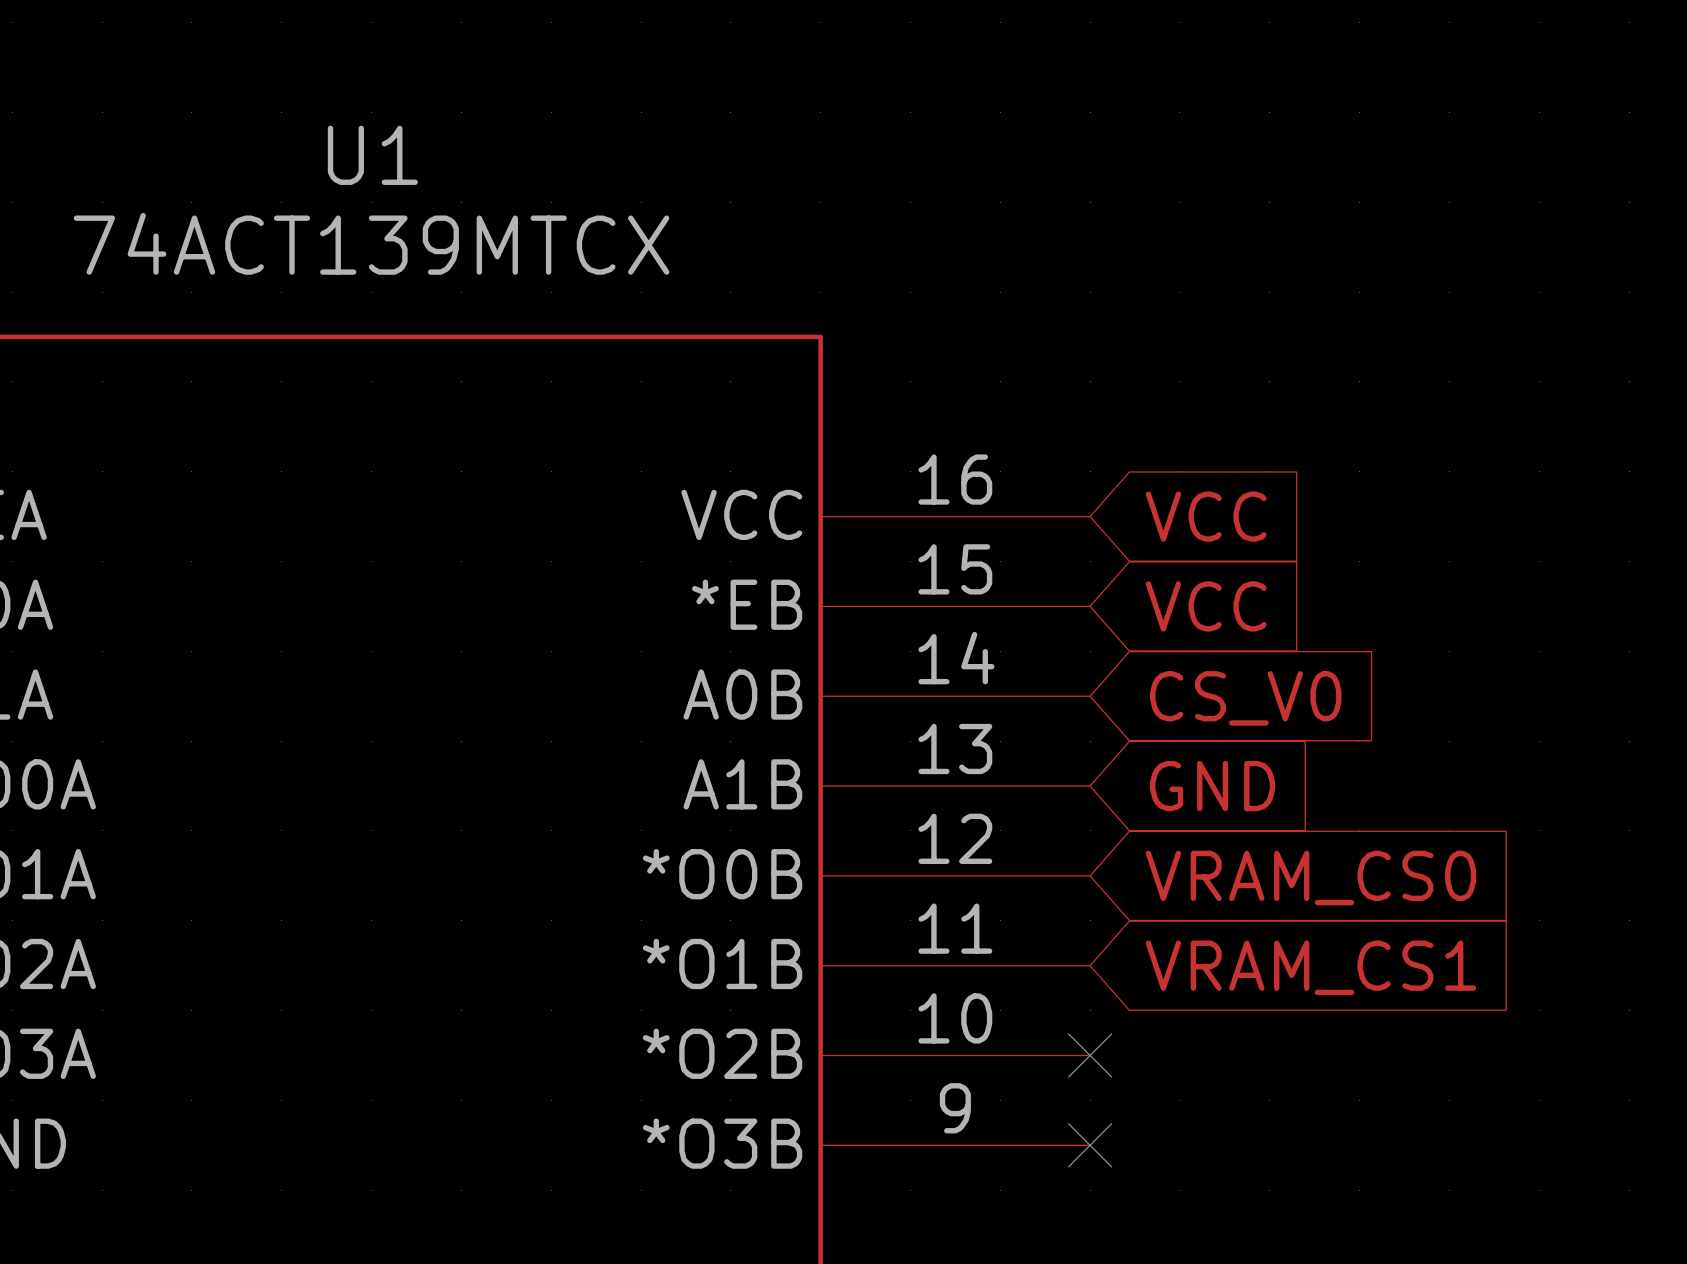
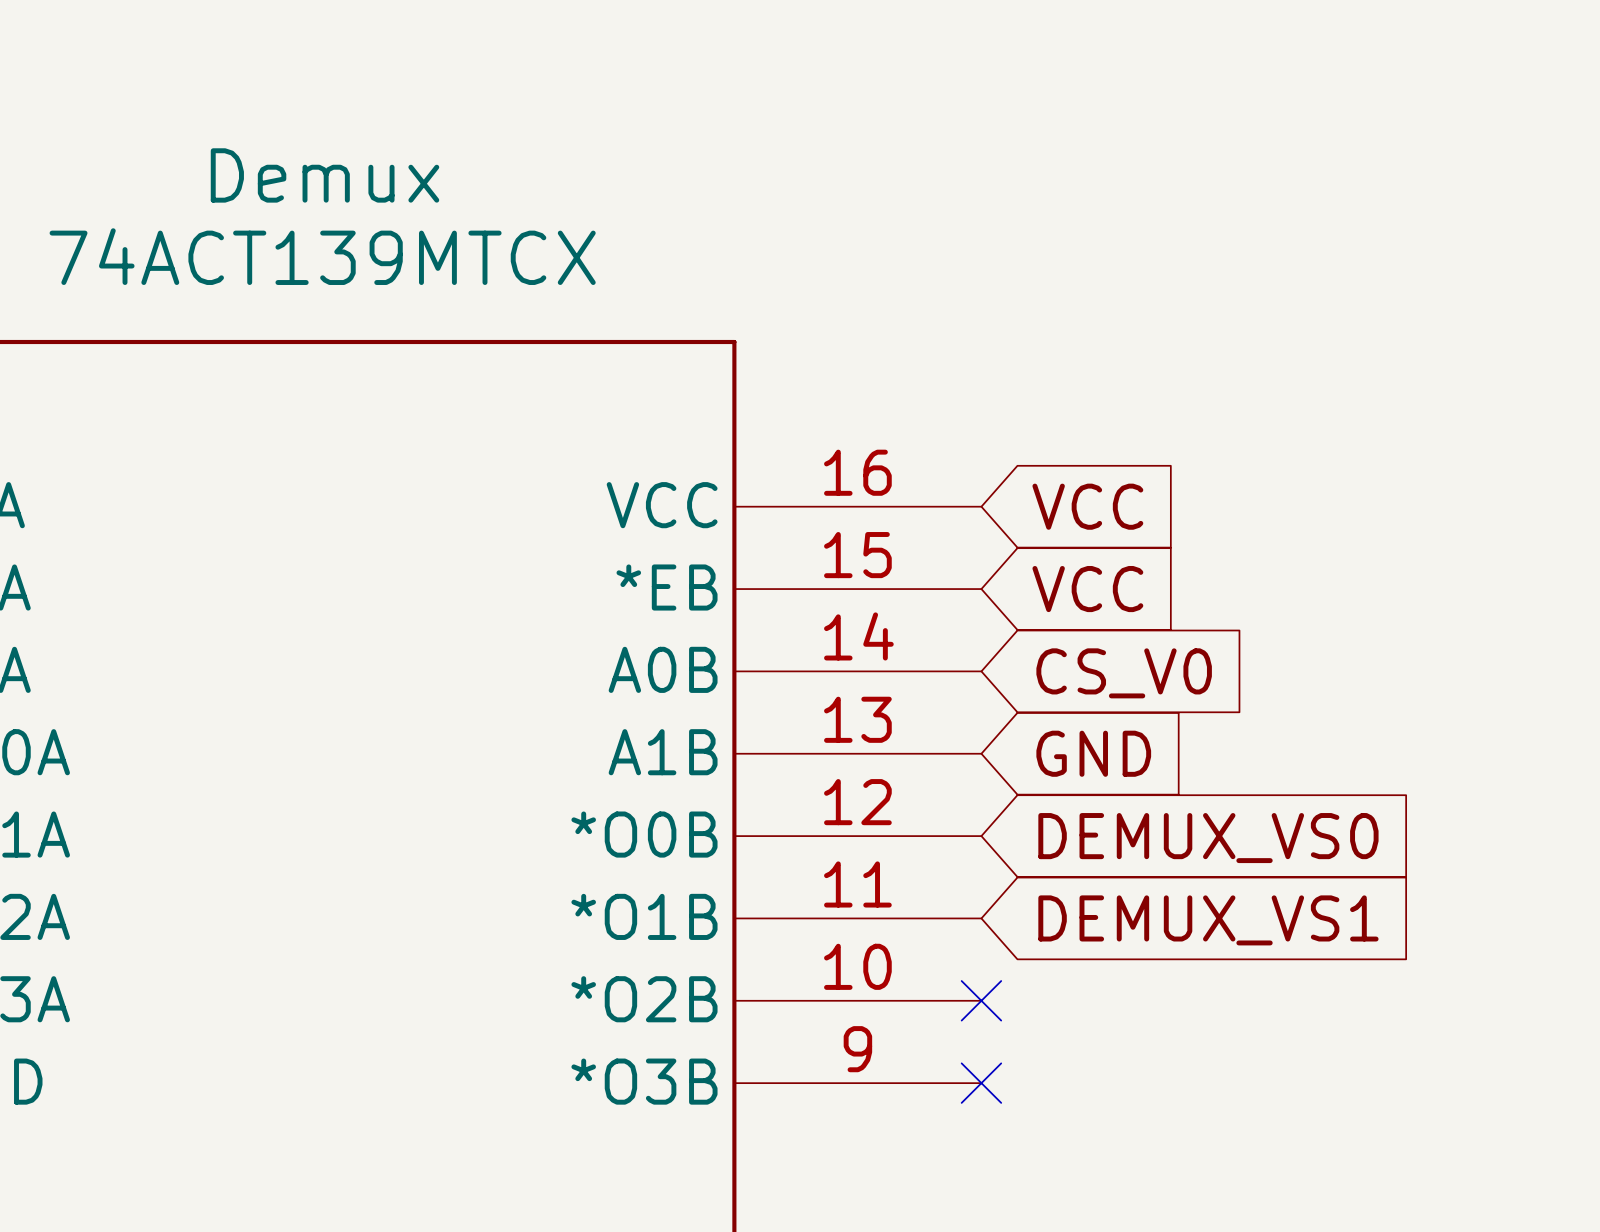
U1 name: U1 (372, 155) -> Demux (325, 175)
global label: VRAM_CS0 (1310, 878) -> DEMUX_VS0 (1208, 838)
global label: VRAM_CS1 (1310, 967) -> DEMUX_VS1 (1208, 920)

